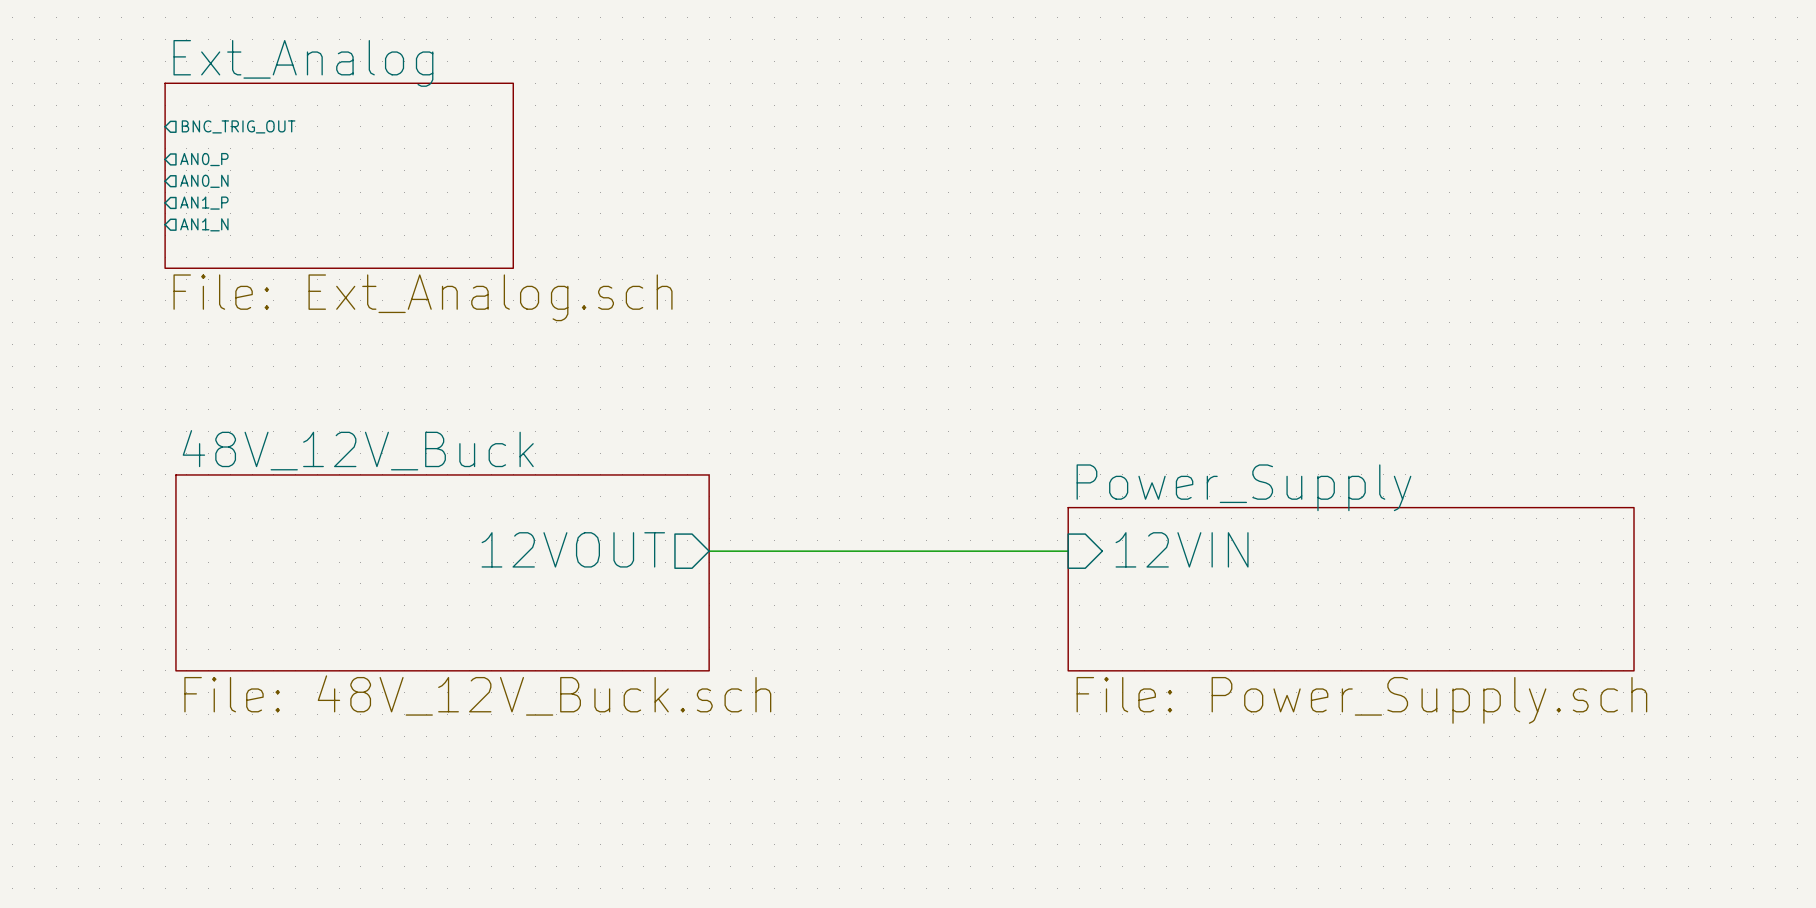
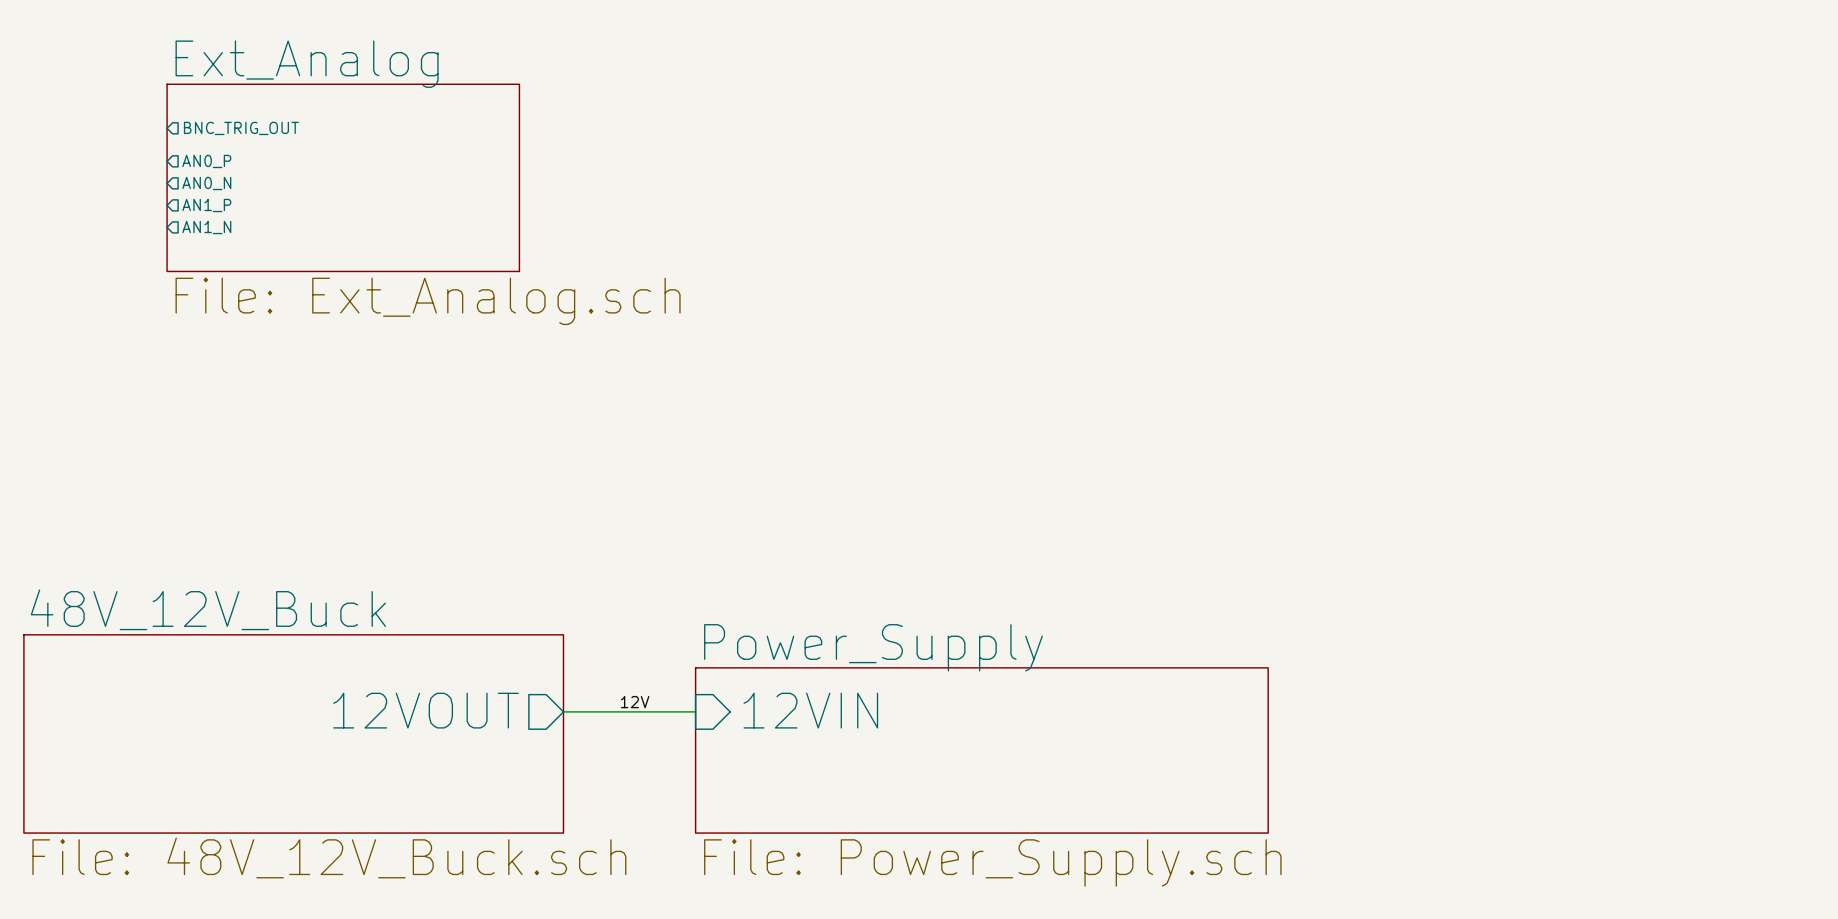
sheet pin: 12VOUT (573, 549) -> none
sheet pin: 12VIN (1182, 549) -> none
wire: (709, 551) (1068, 551) -> none
sheet 48V_12V_Buck position: (442, 572) -> (293, 733)
sheet Power_Supply: File: Power_Supply.sch (1351, 589) -> none
label: none -> 12V (635, 702)
sheet pin: none -> 12VOUT (426, 710)
sheet pin: none -> 12VIN (810, 710)
wire: none -> (563, 711) (695, 711)
sheet Power_Supply: none -> File: Power_Supply.sch (981, 750)

